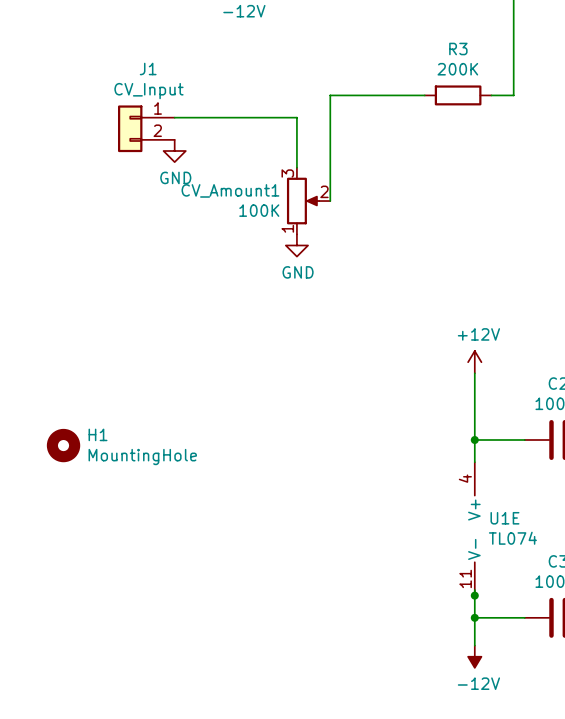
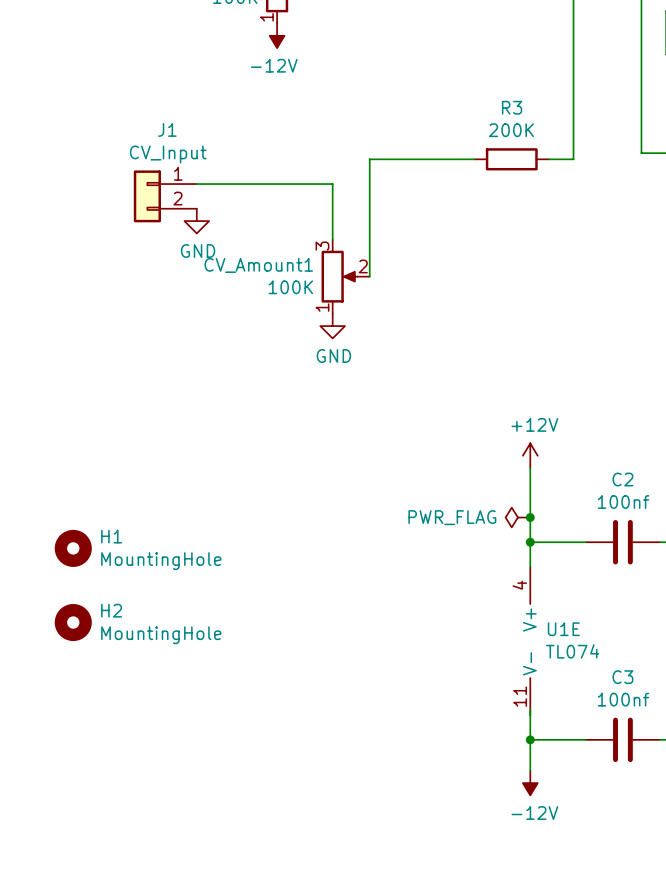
power symbol: none -> PWR_FLAG (517, 517)
junction: none -> (530, 517)
H2: none -> MountingHole (73, 622)
junction: (474, 595) -> none

